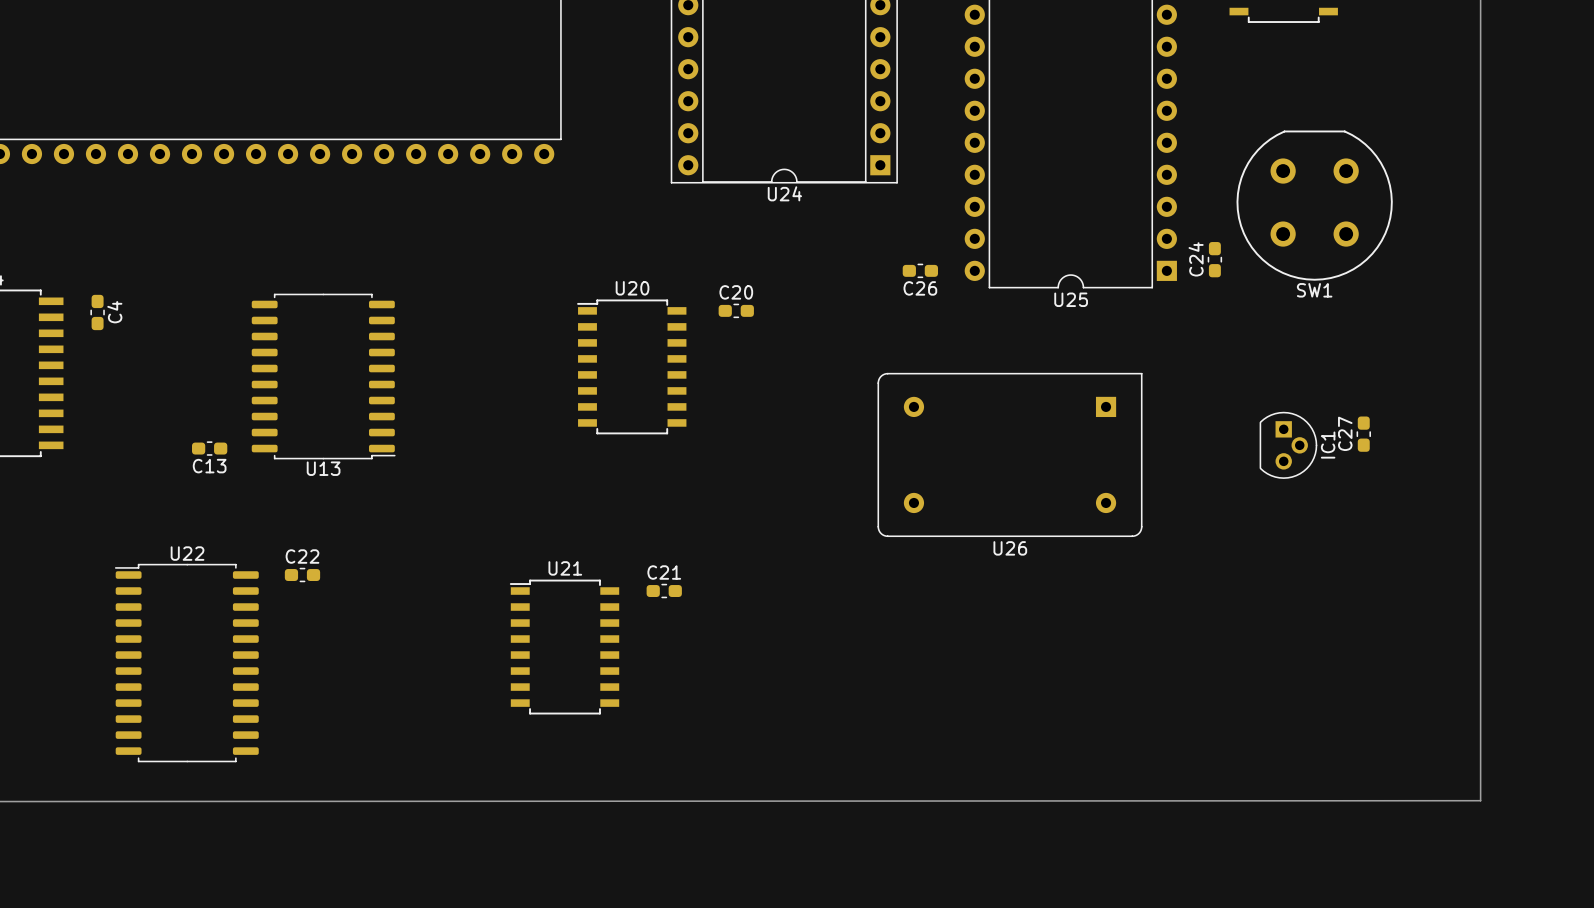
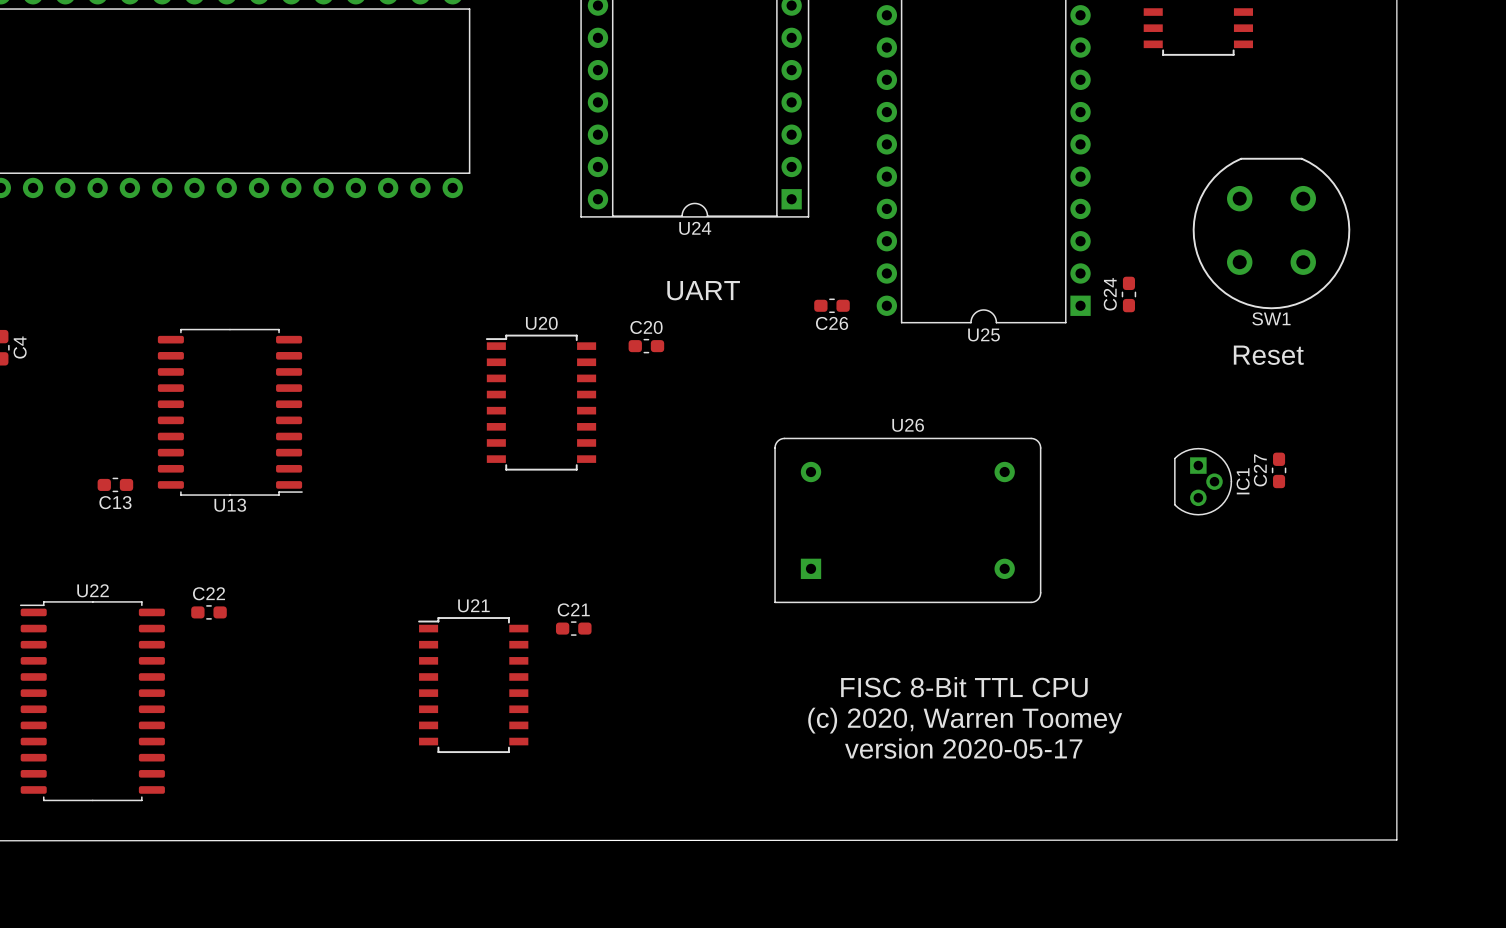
SW1 position: (1314, 205) -> (1271, 233)
text: none -> UART (703, 290)
text: none -> Reset (1268, 355)
U26 rotation: 0° (1010, 454) -> 180° (907, 520)
text: none -> FISC 8-Bit TTL CPU (964, 687)
text: none -> (c) 2020, Warren Toomey (965, 720)
text: none -> version 2020-05-17 (963, 748)

